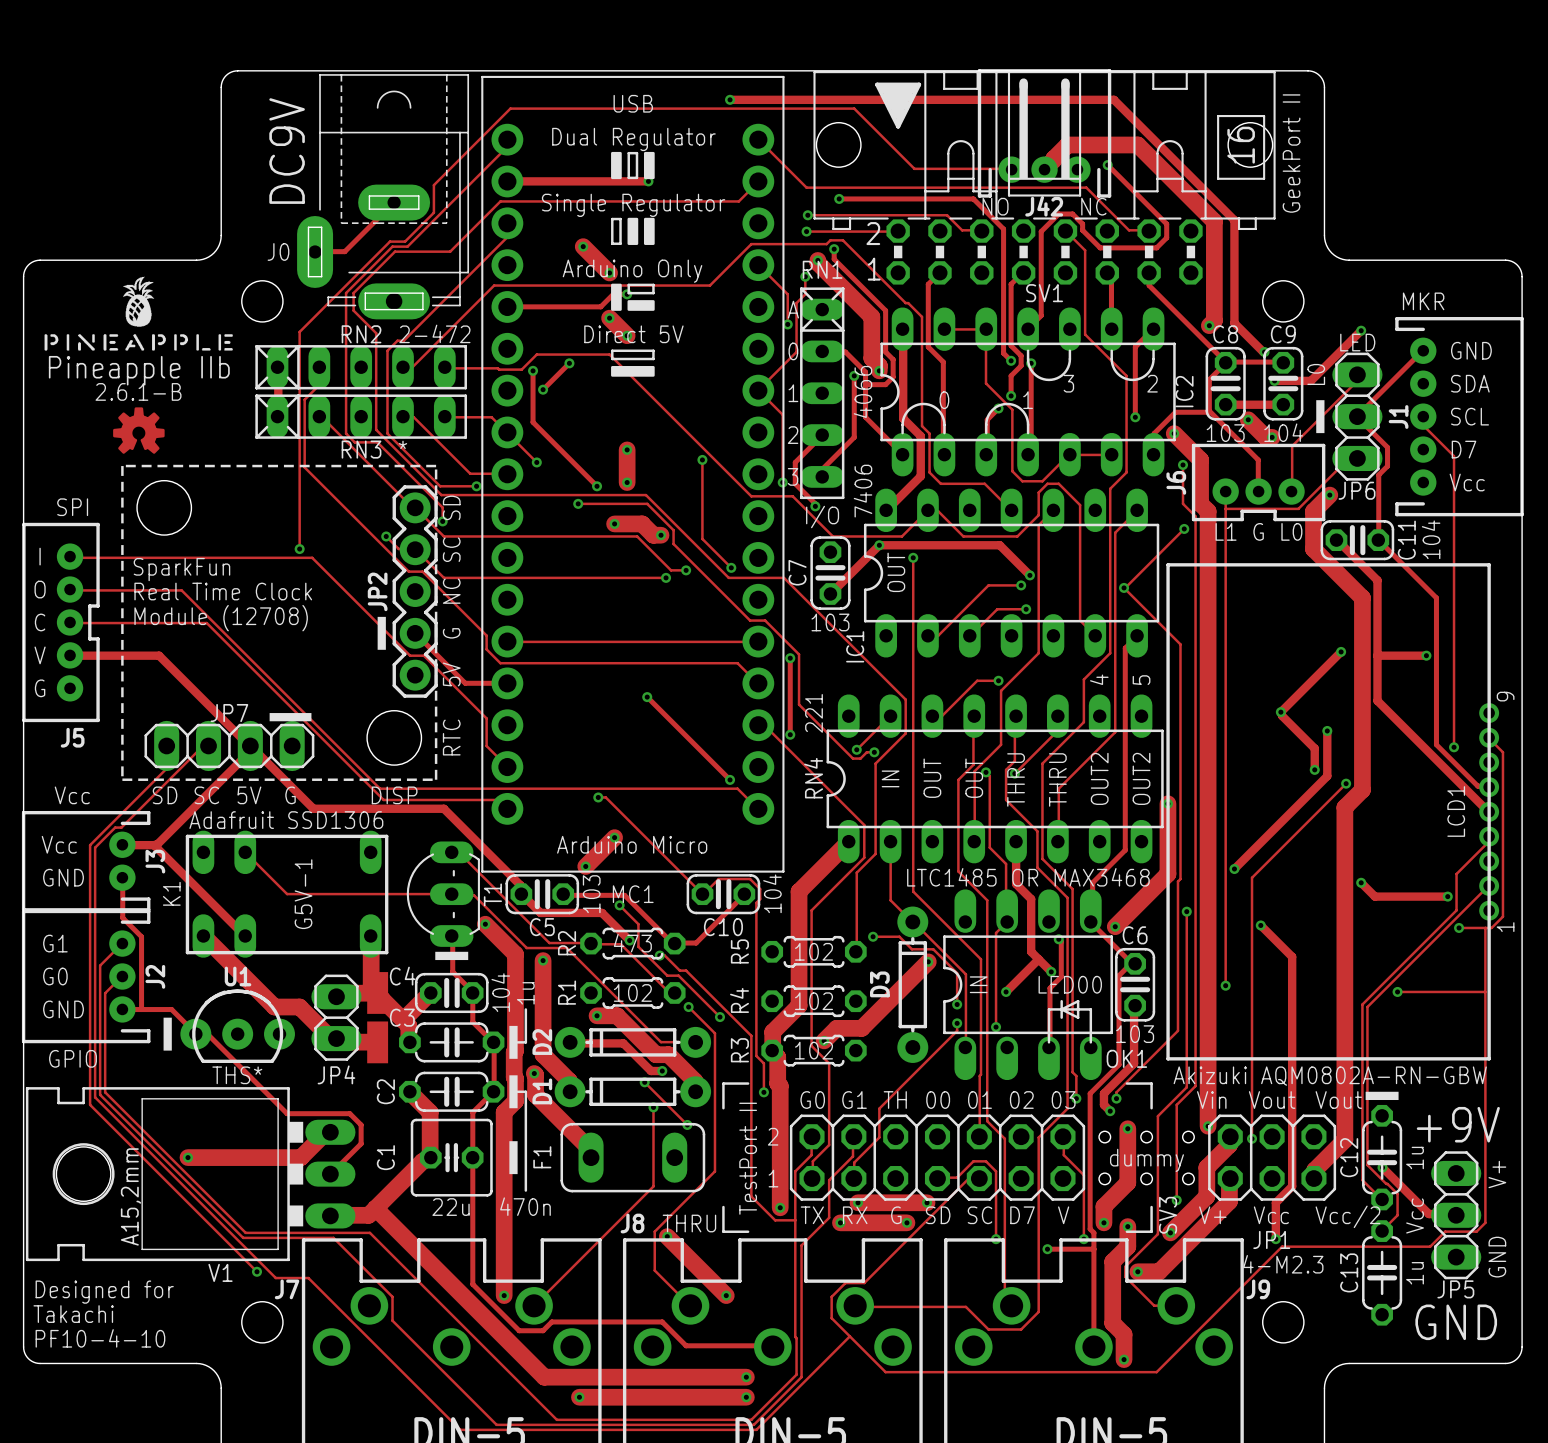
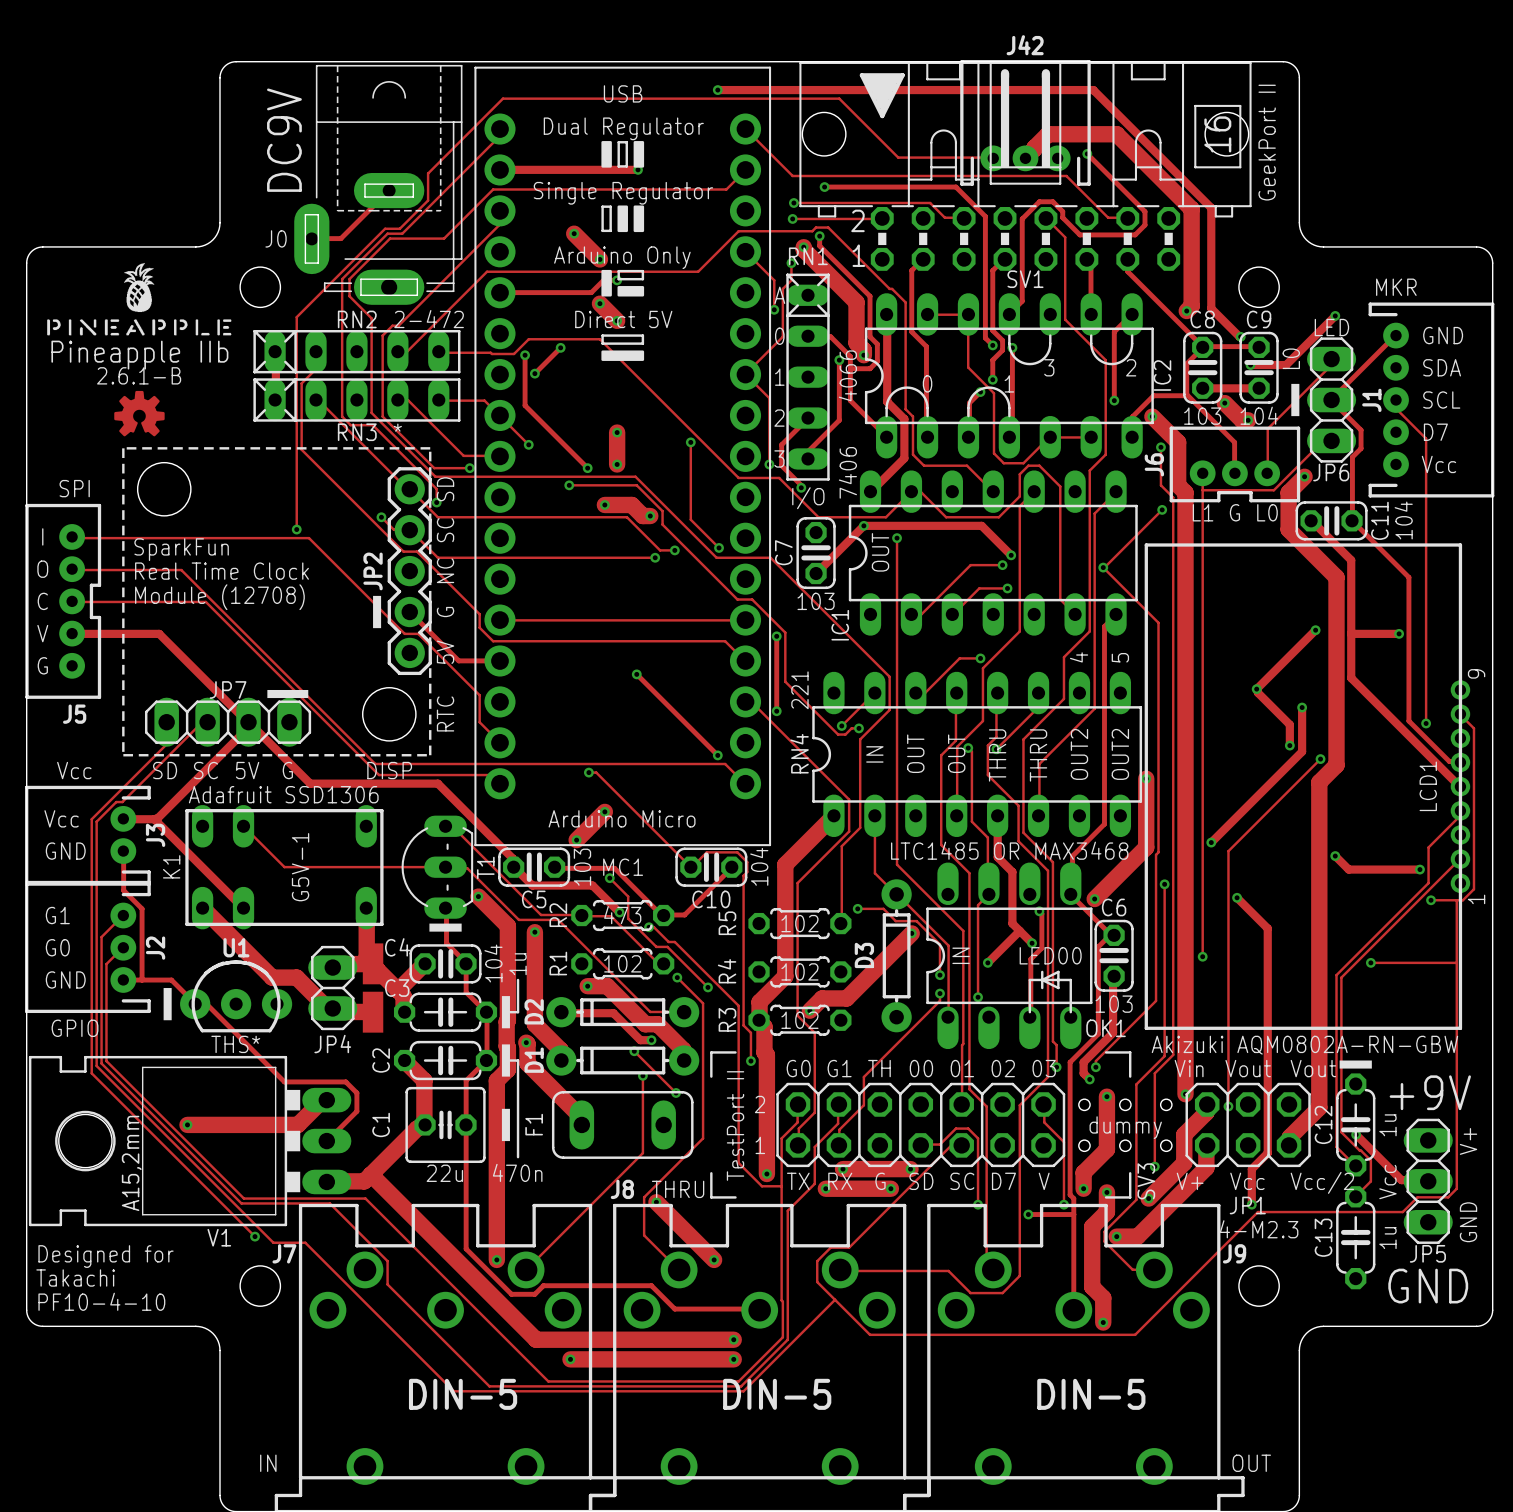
text: NO (995, 206) -> none
J42 name position: J42 (1044, 206) -> J42 (1025, 45)
text: NC (1093, 206) -> none

